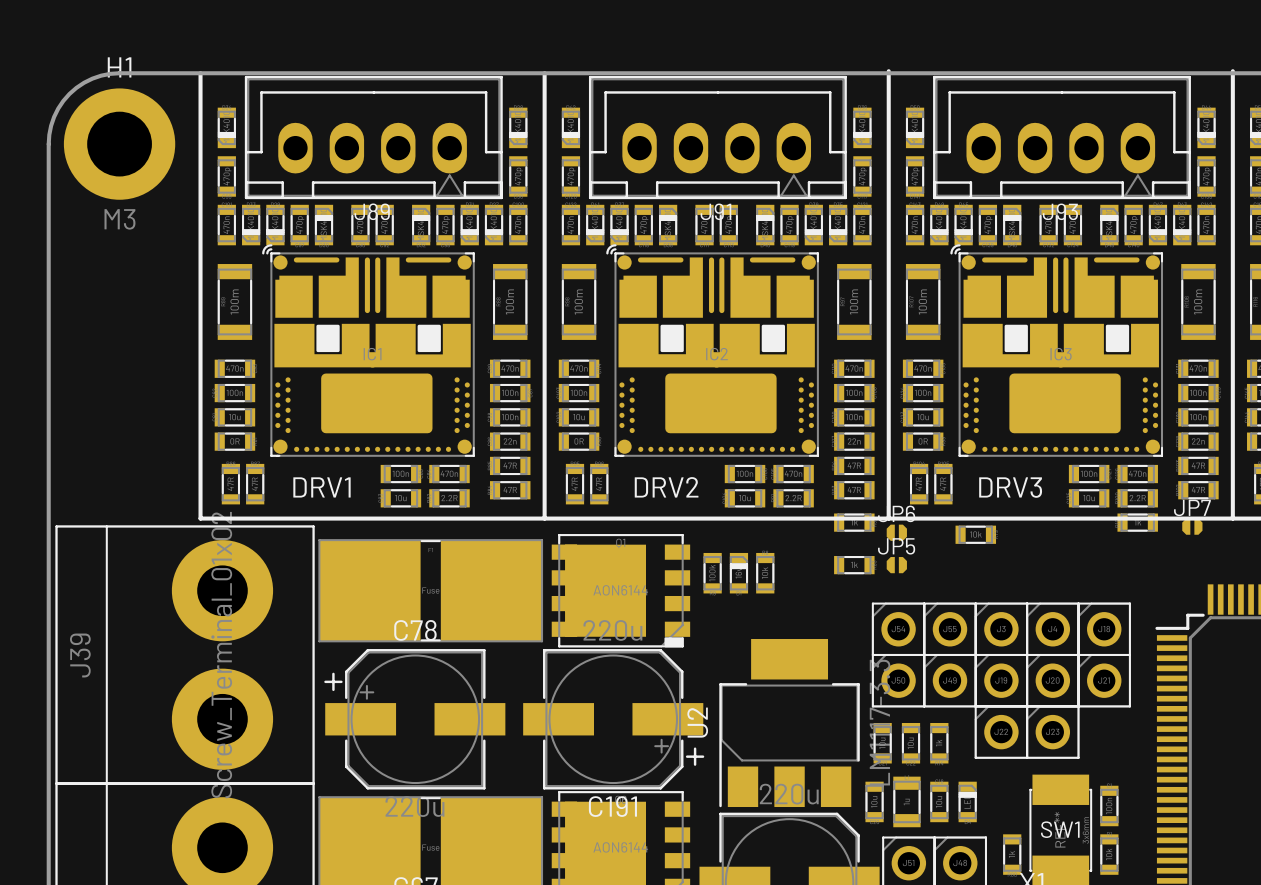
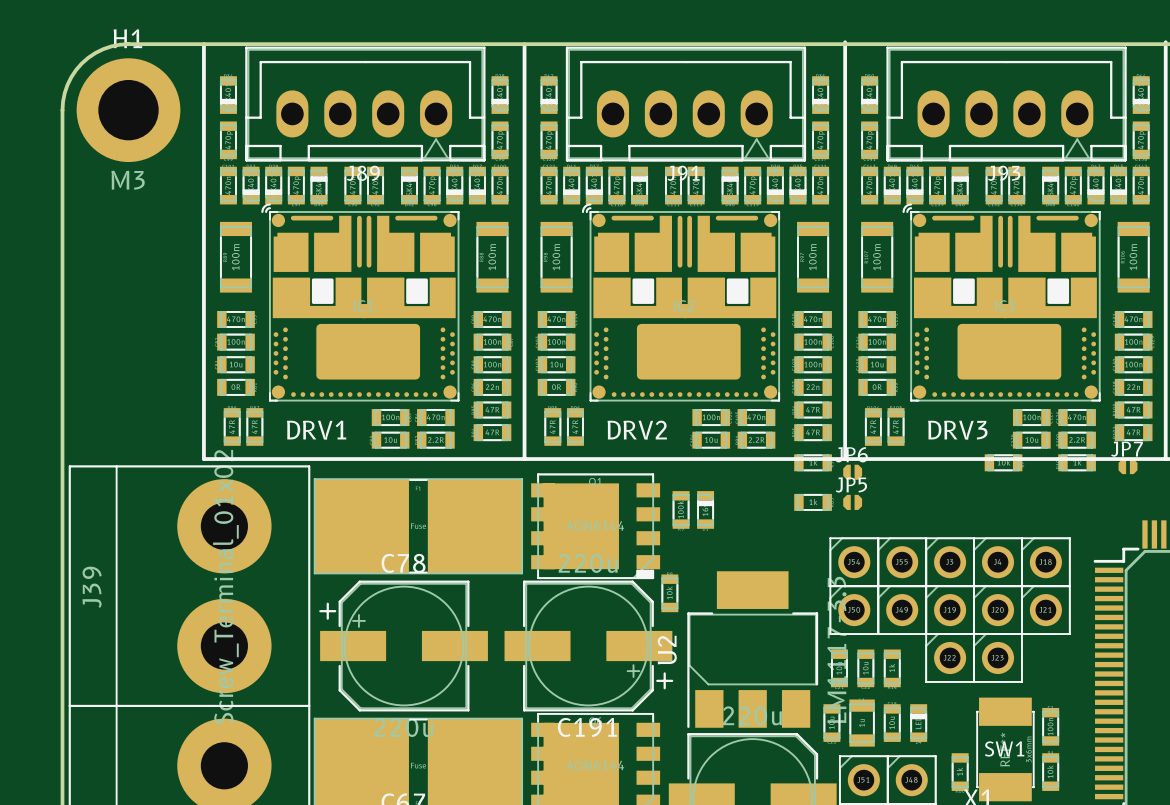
part position: (975, 534) -> (1003, 462)
part position: (765, 573) -> (669, 593)

